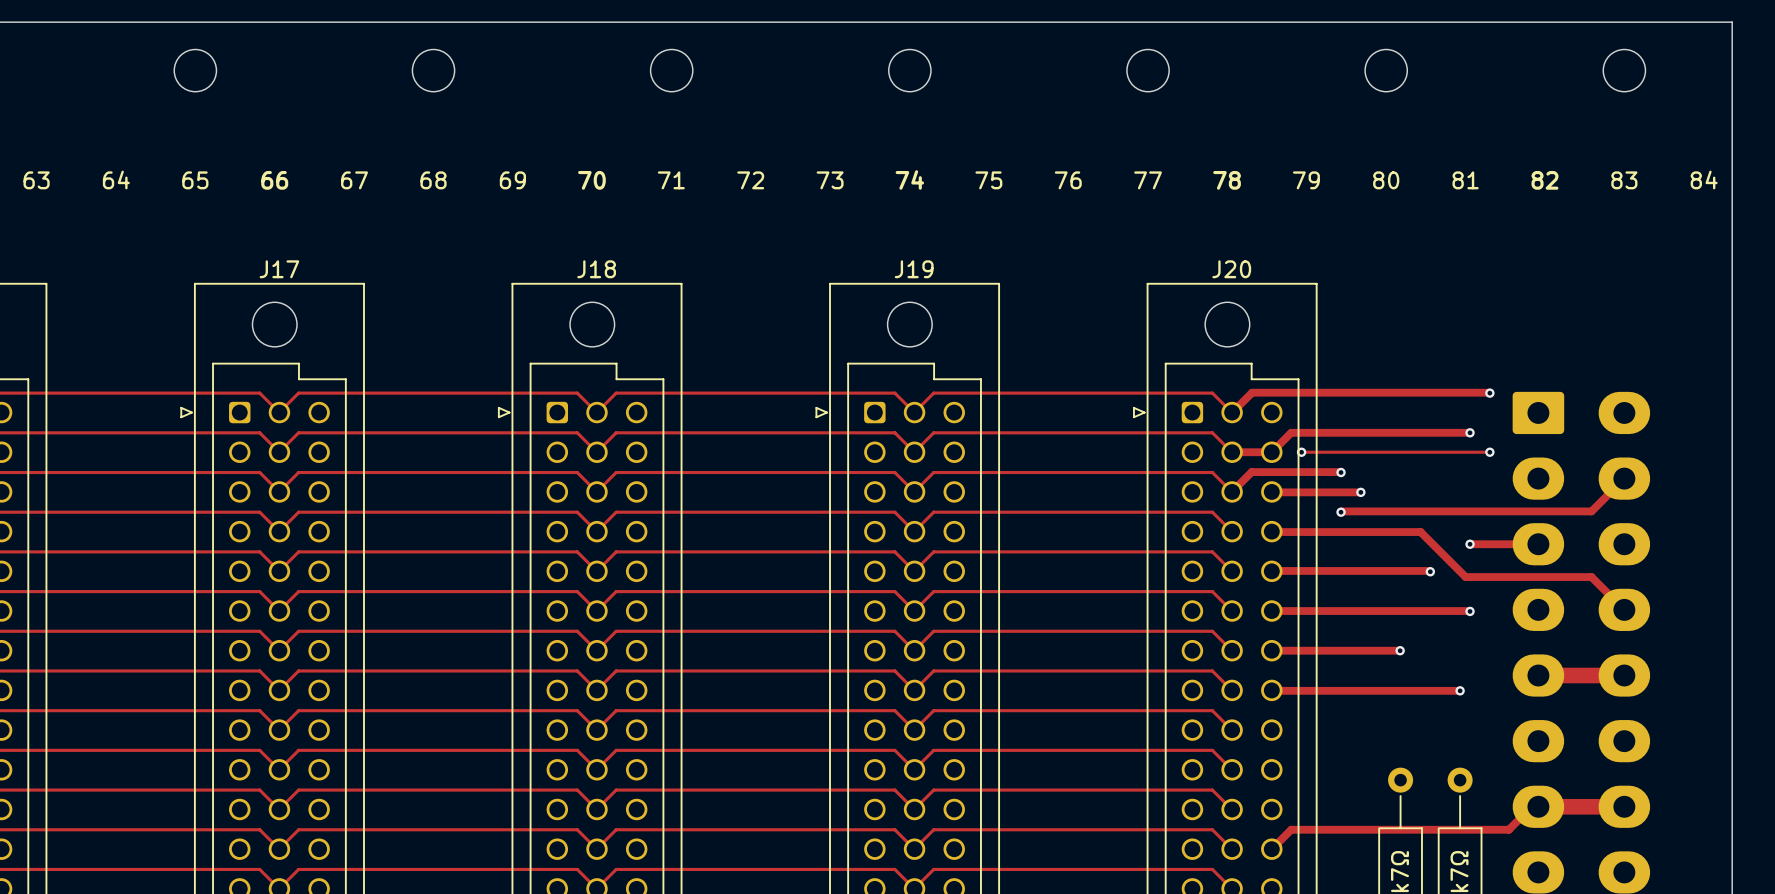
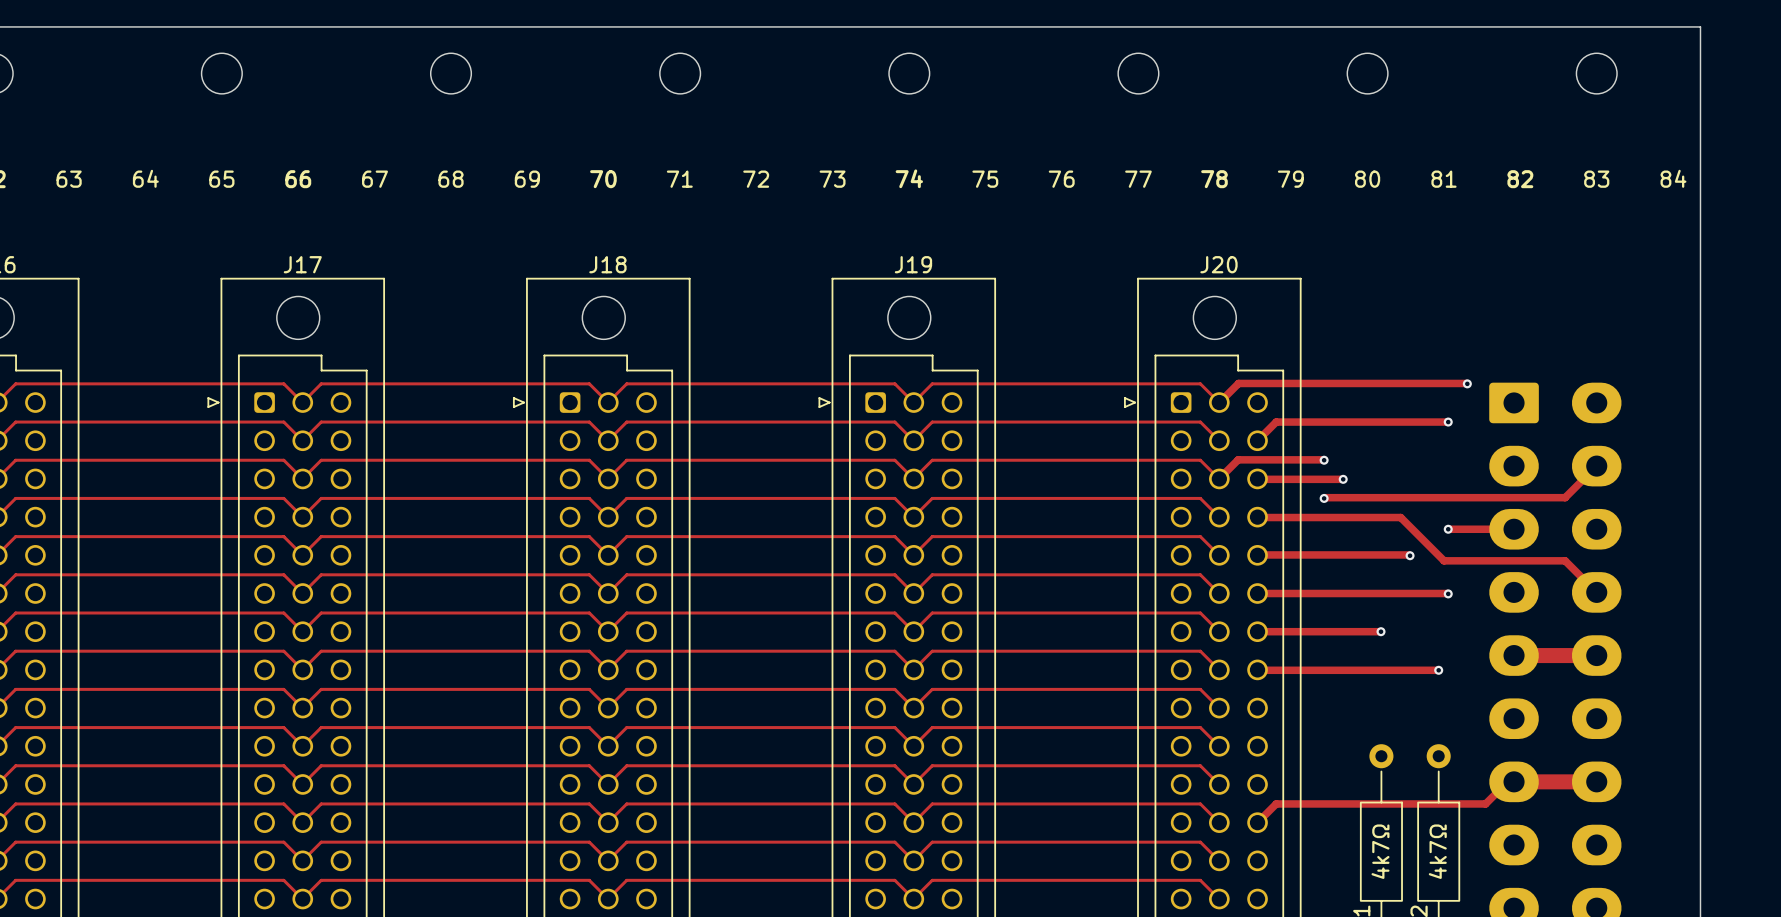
track: (1232, 452) (1271, 452) -> none
track: (1301, 452) (1490, 452) -> none
via: (1301, 452) -> none
via: (1489, 452) -> none

